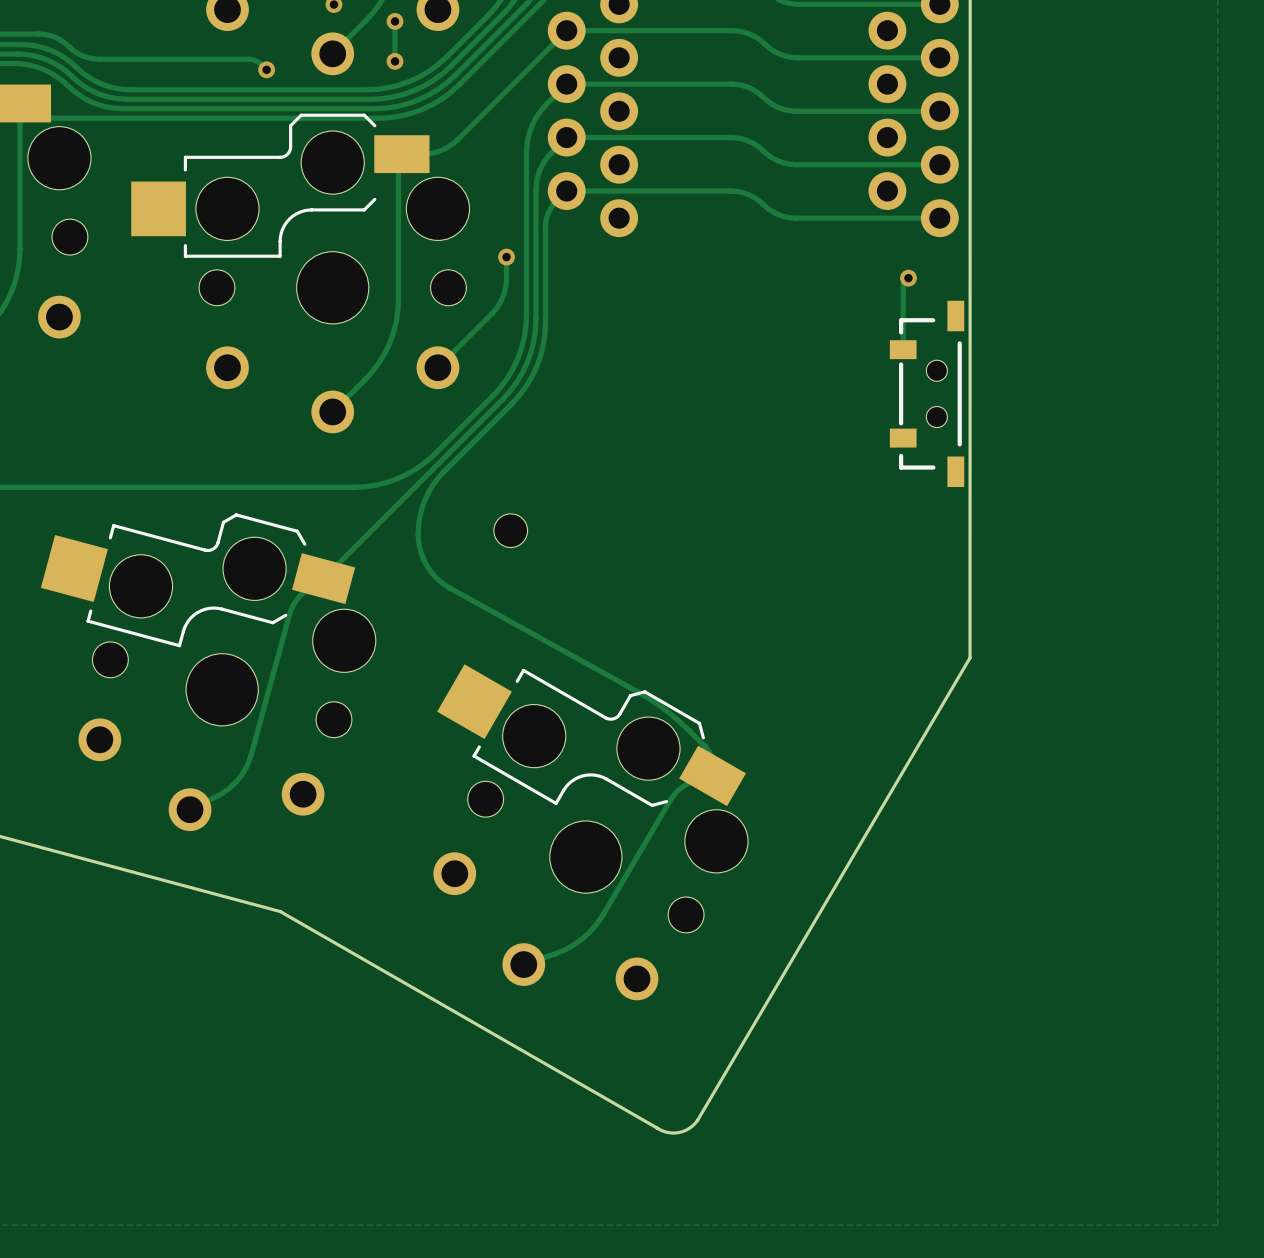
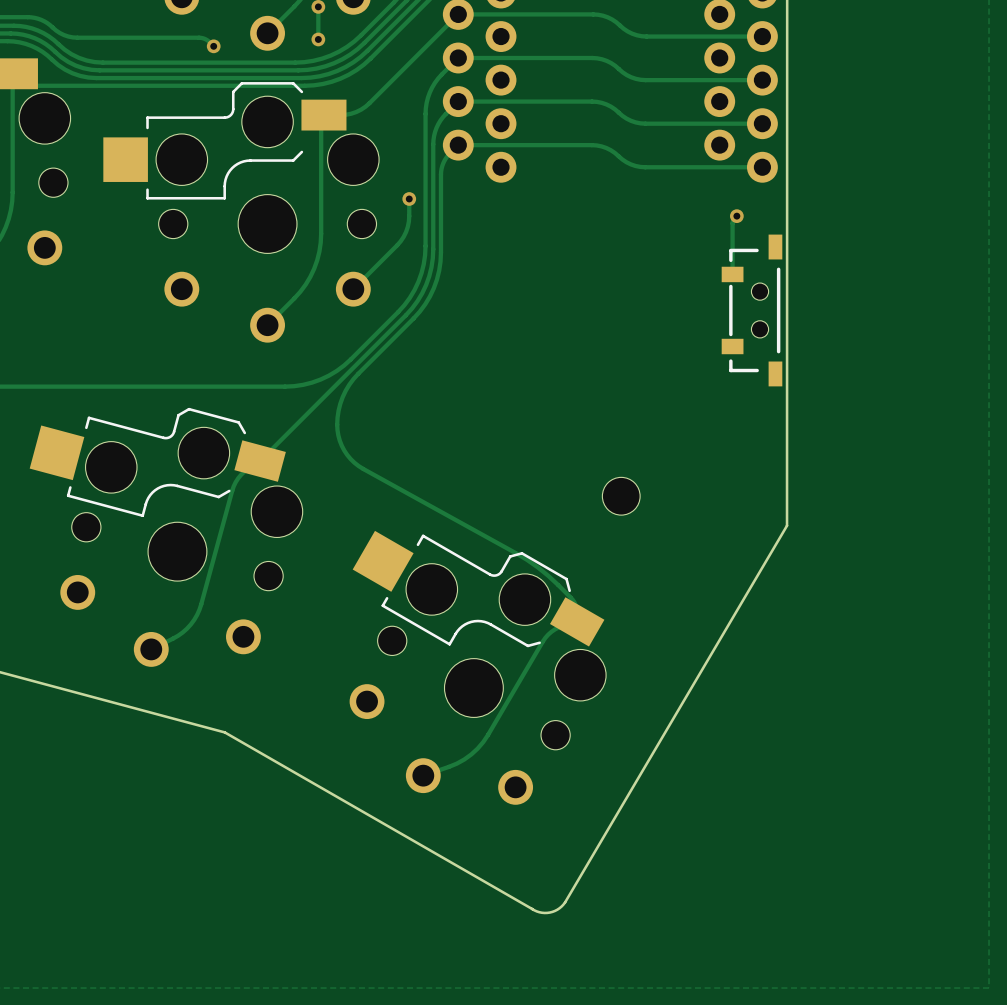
part: (510, 530) -> none
part: none -> (621, 496)

